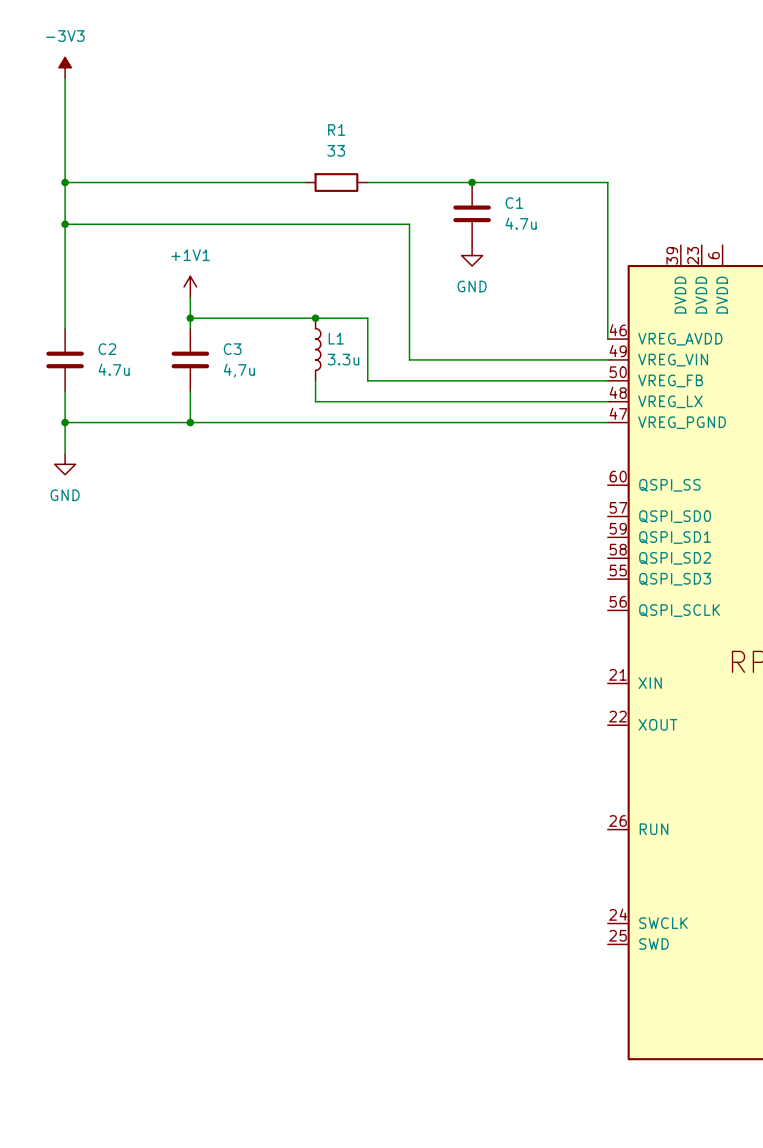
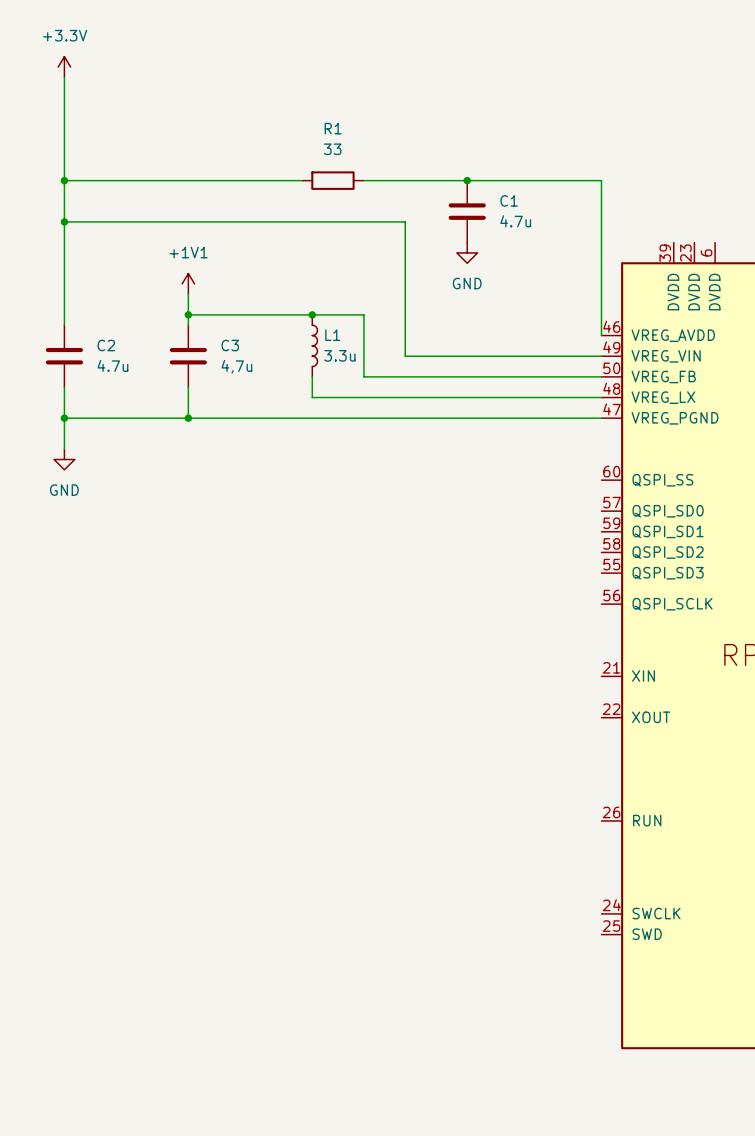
power symbol: -3V3 (65, 67) -> +3.3V (64, 67)

